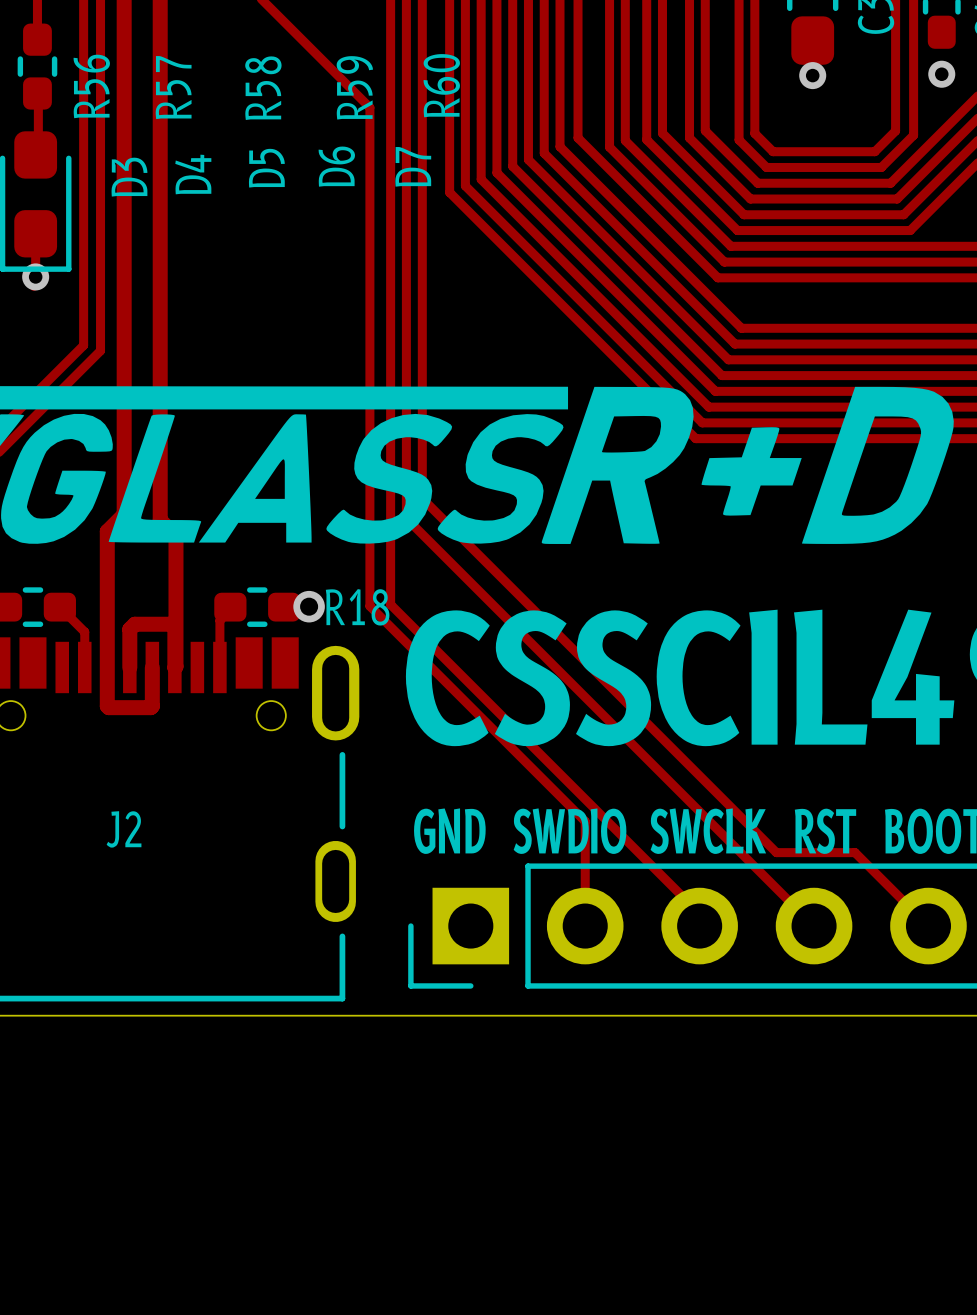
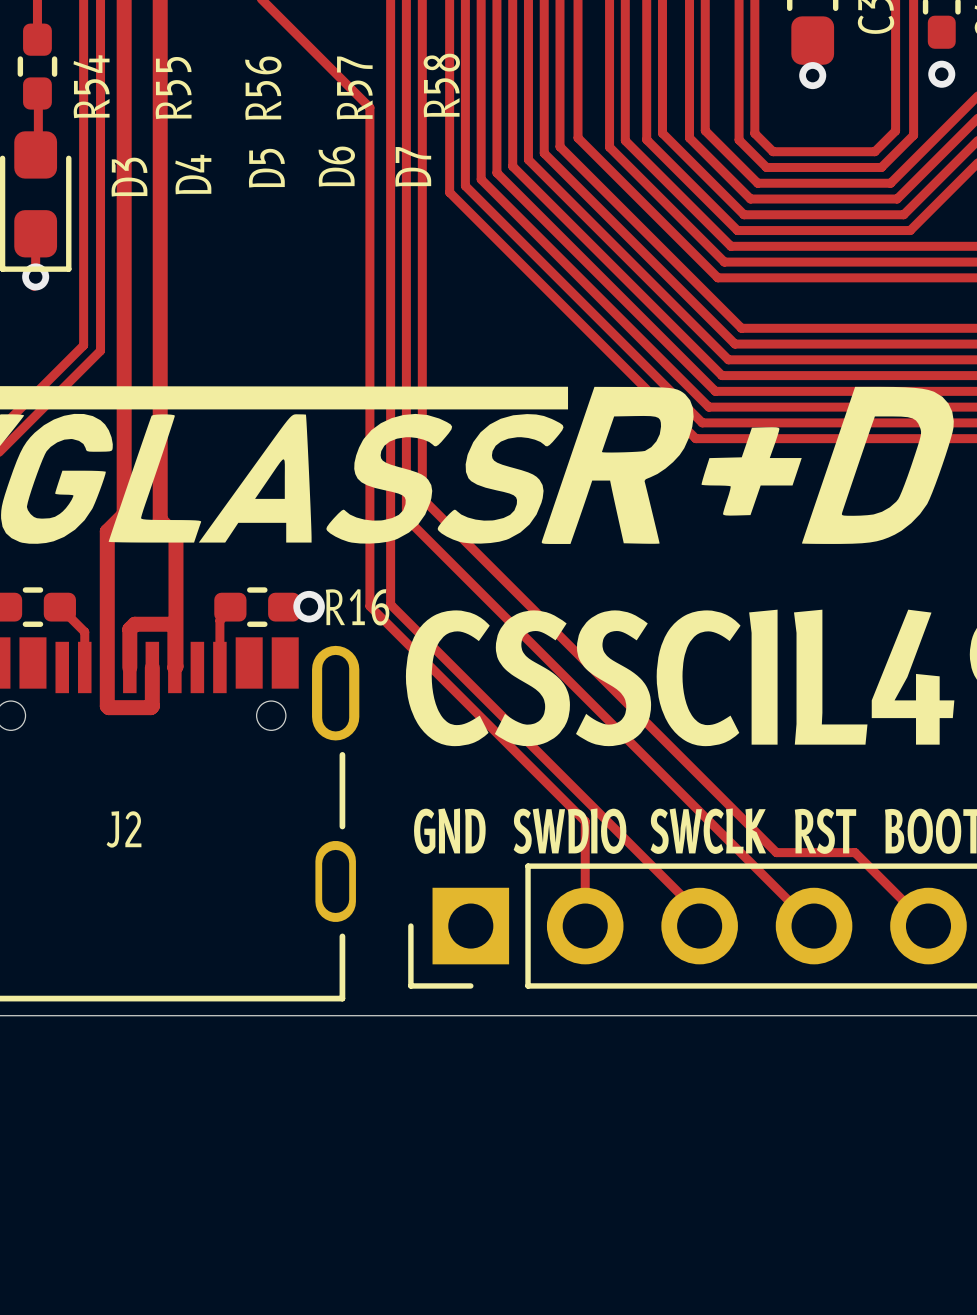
R60 name: R60 (441, 85) -> R58 (441, 85)
R56 name: R56 (91, 86) -> R54 (91, 86)
R57 name: R57 (173, 87) -> R55 (173, 88)
R59 name: R59 (354, 87) -> R57 (354, 88)
R58 name: R58 (263, 88) -> R56 (263, 88)
R18 name: R18 (357, 607) -> R16 (357, 607)

